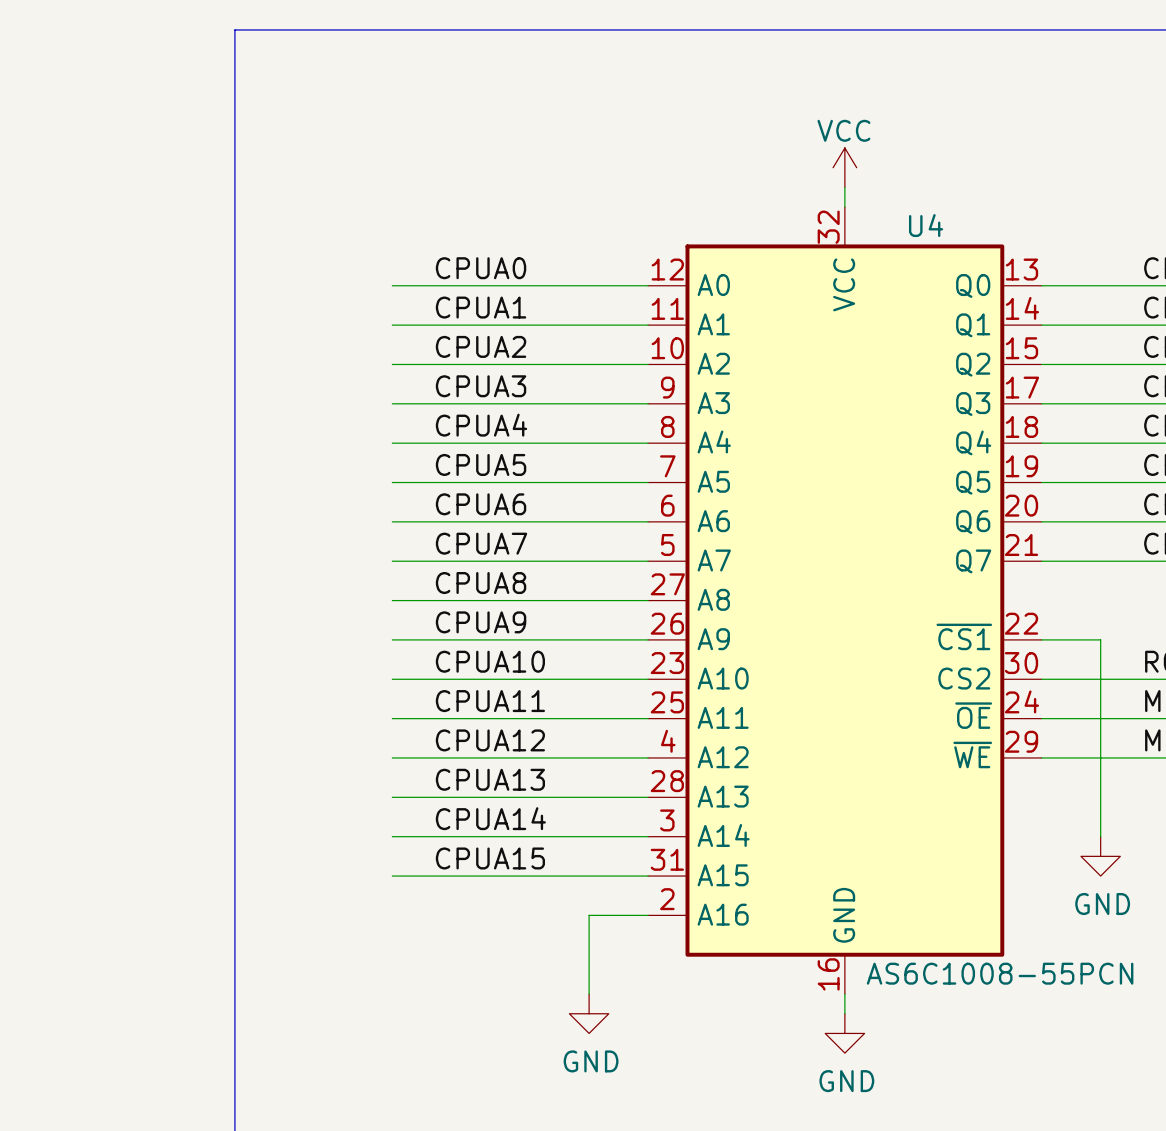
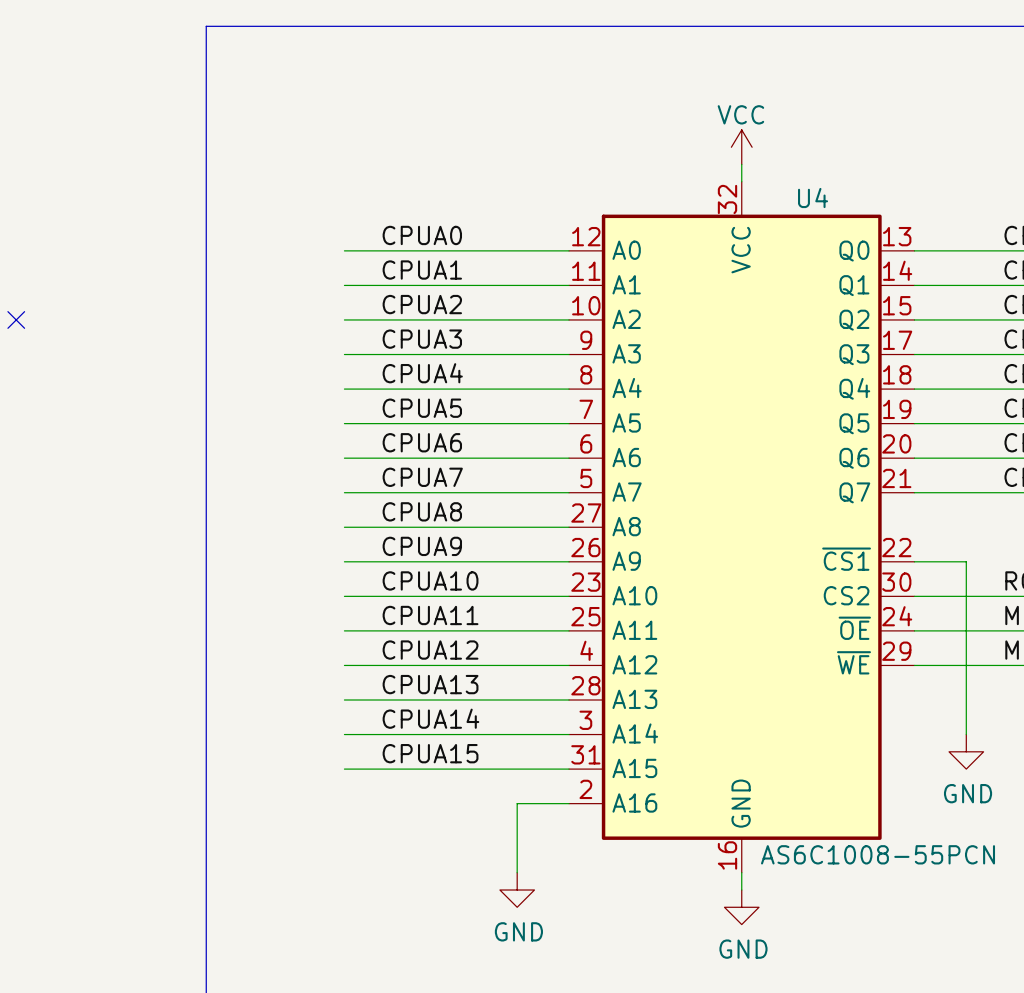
no-connect mark: none -> (16, 319)

